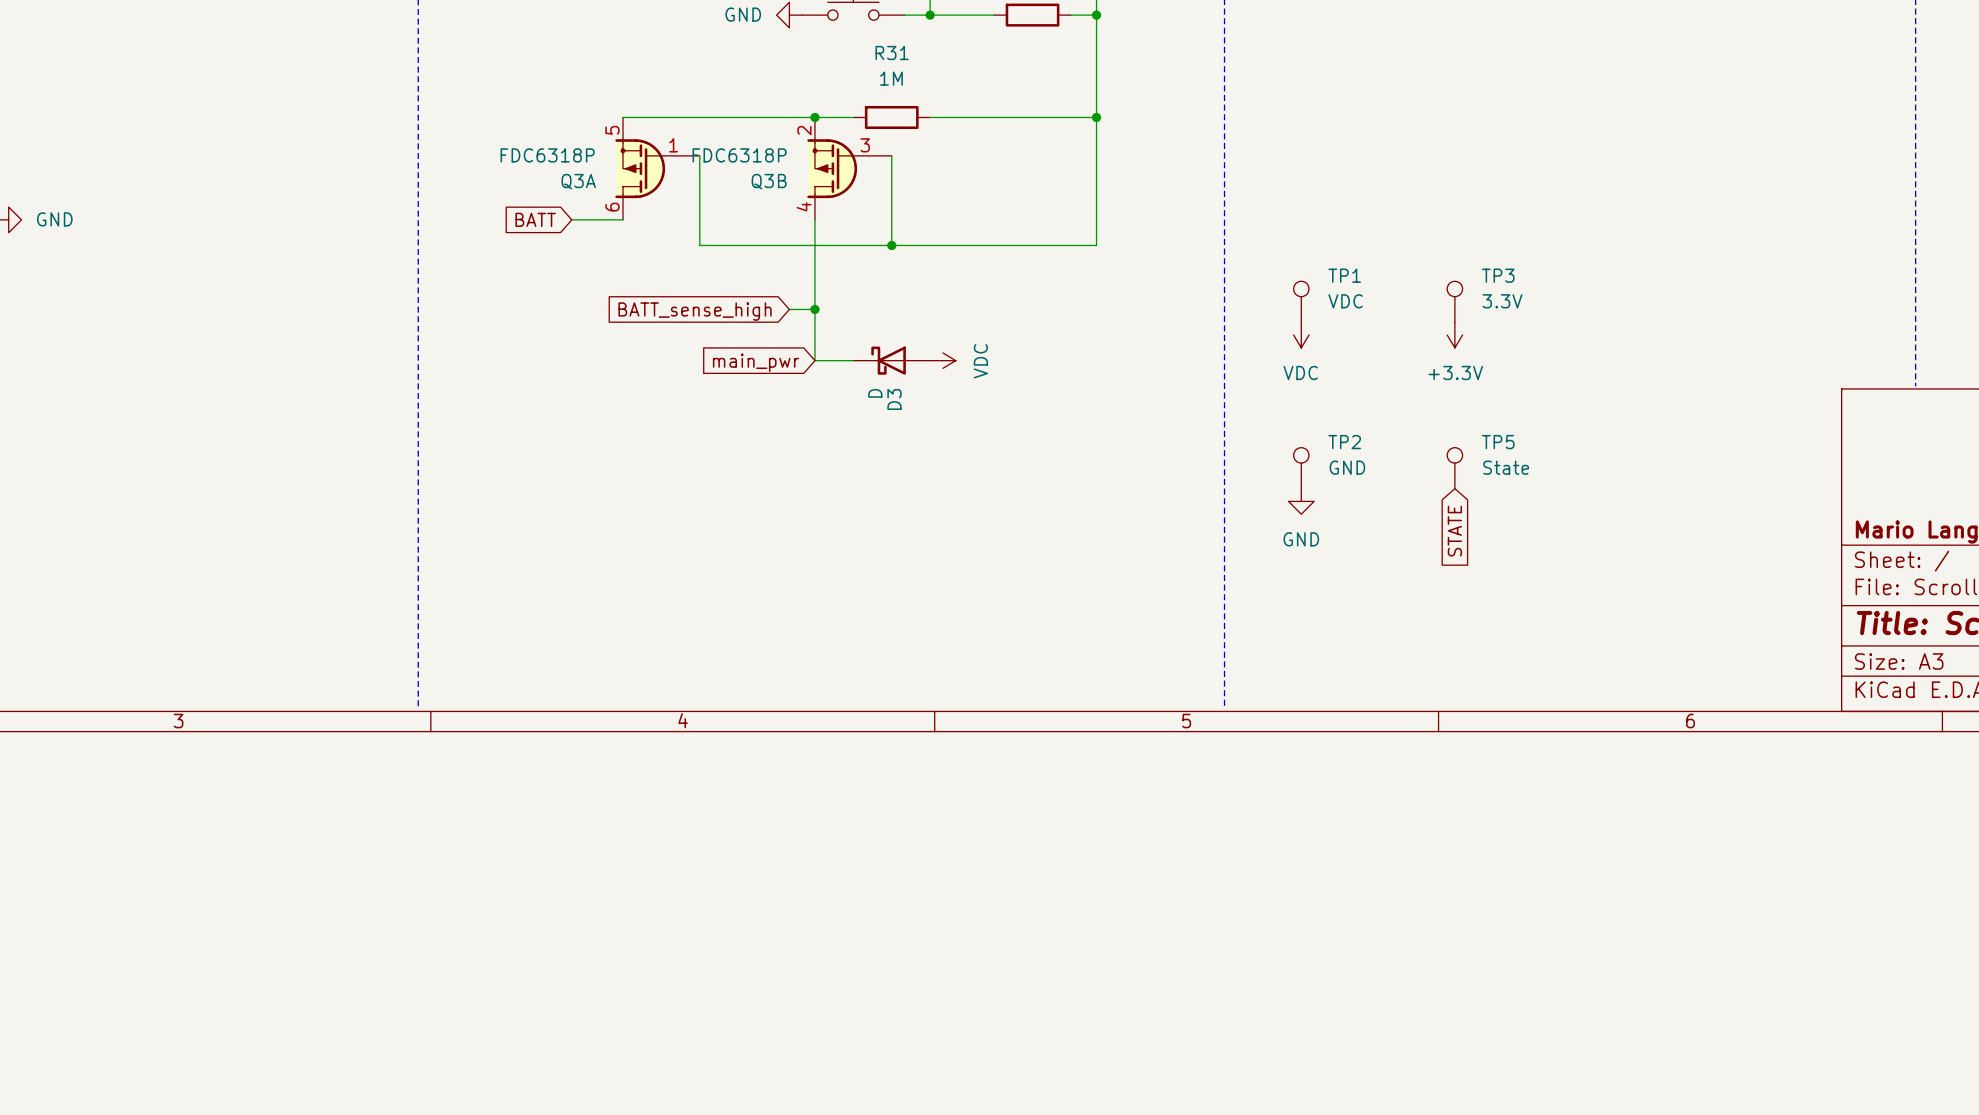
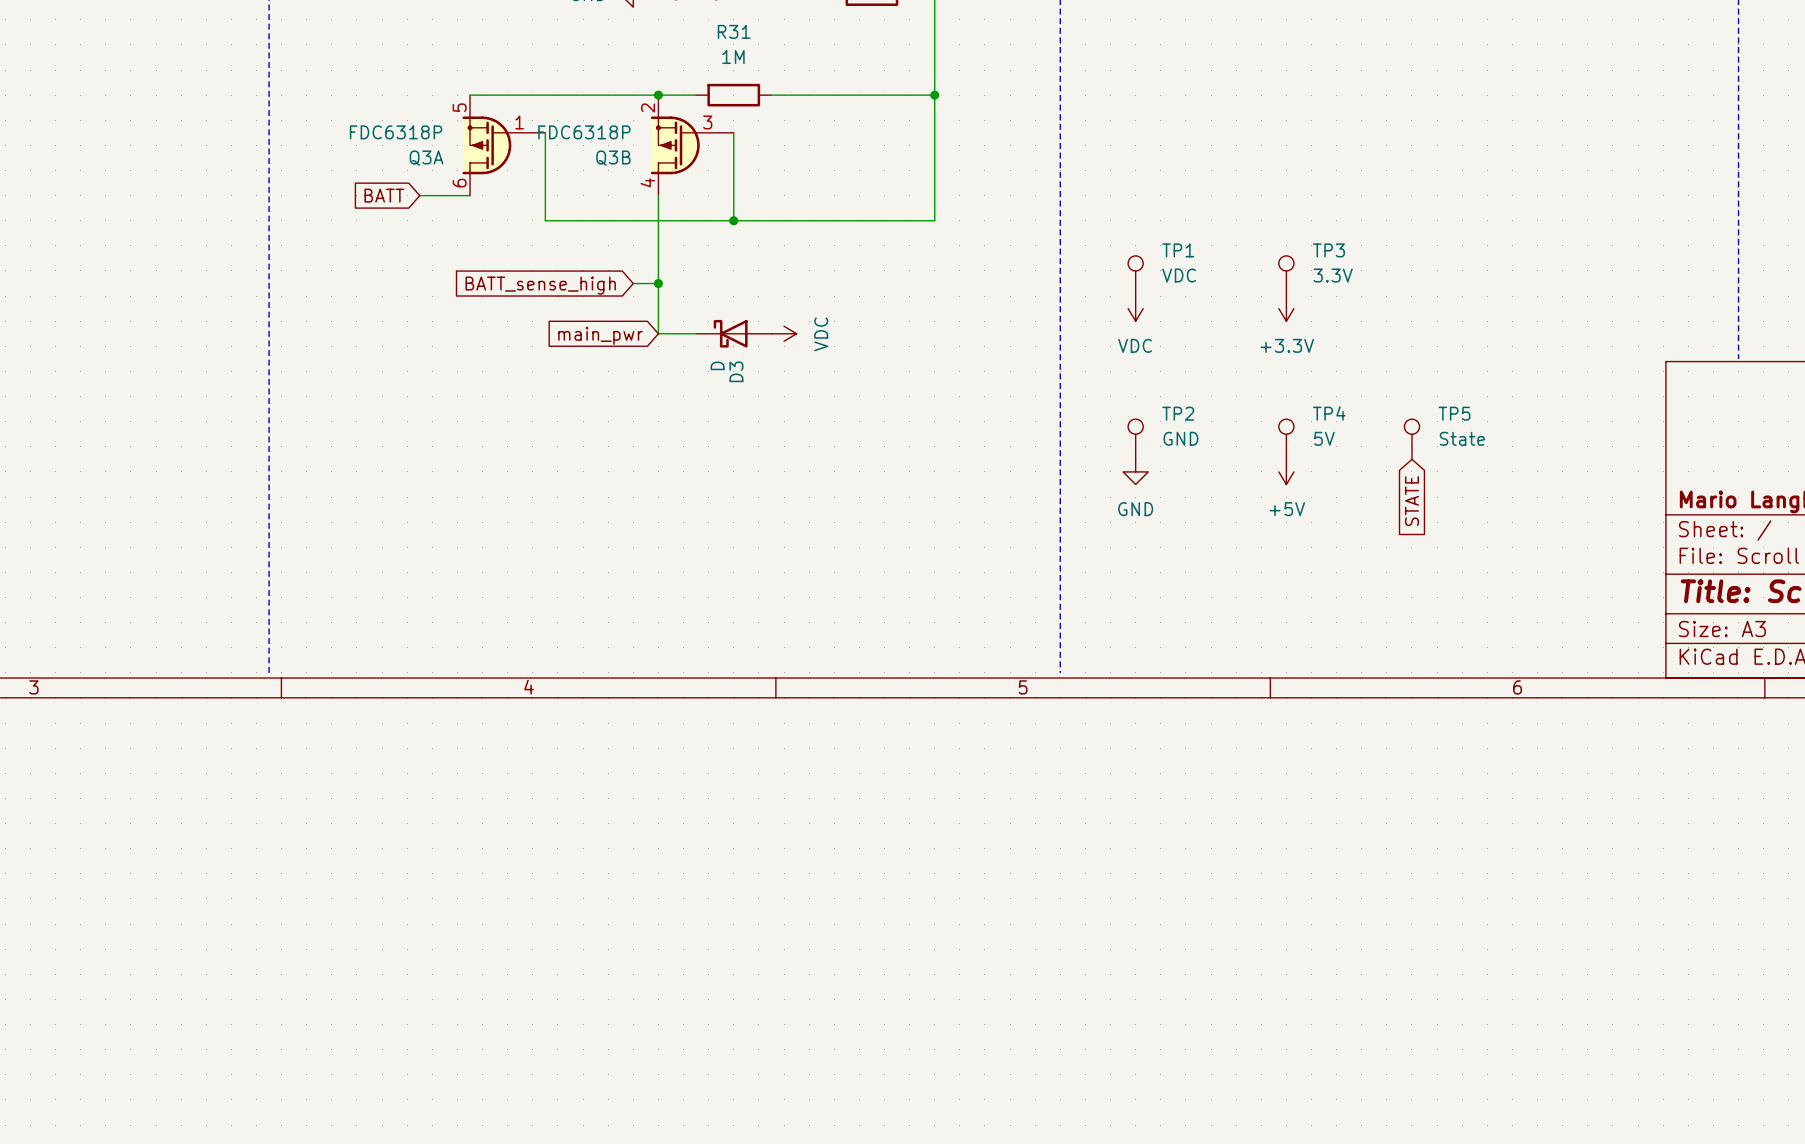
TP5 name: TP5 (1498, 442) -> TP4 (1329, 413)
TP5 value: State (1506, 467) -> 5V (1324, 438)
TP5: none -> State (1411, 439)
power symbol: none -> +5V (1286, 471)
global label position: STATE (1454, 531) -> STATE (1411, 501)

